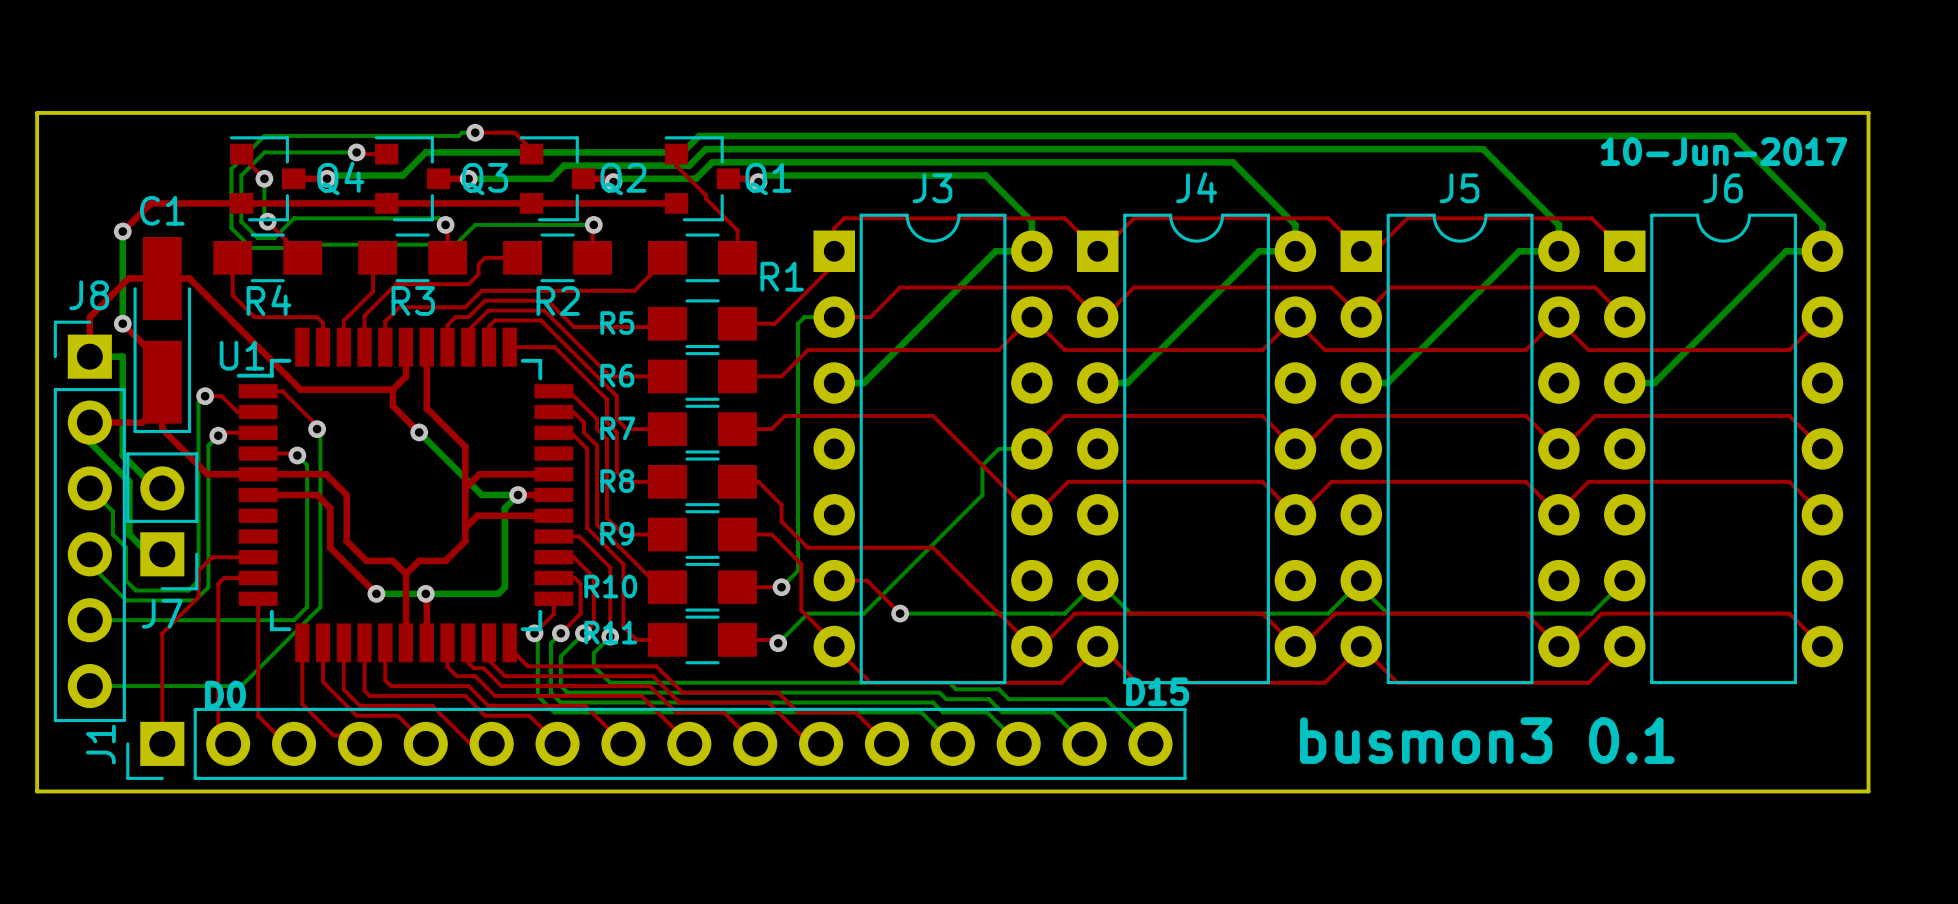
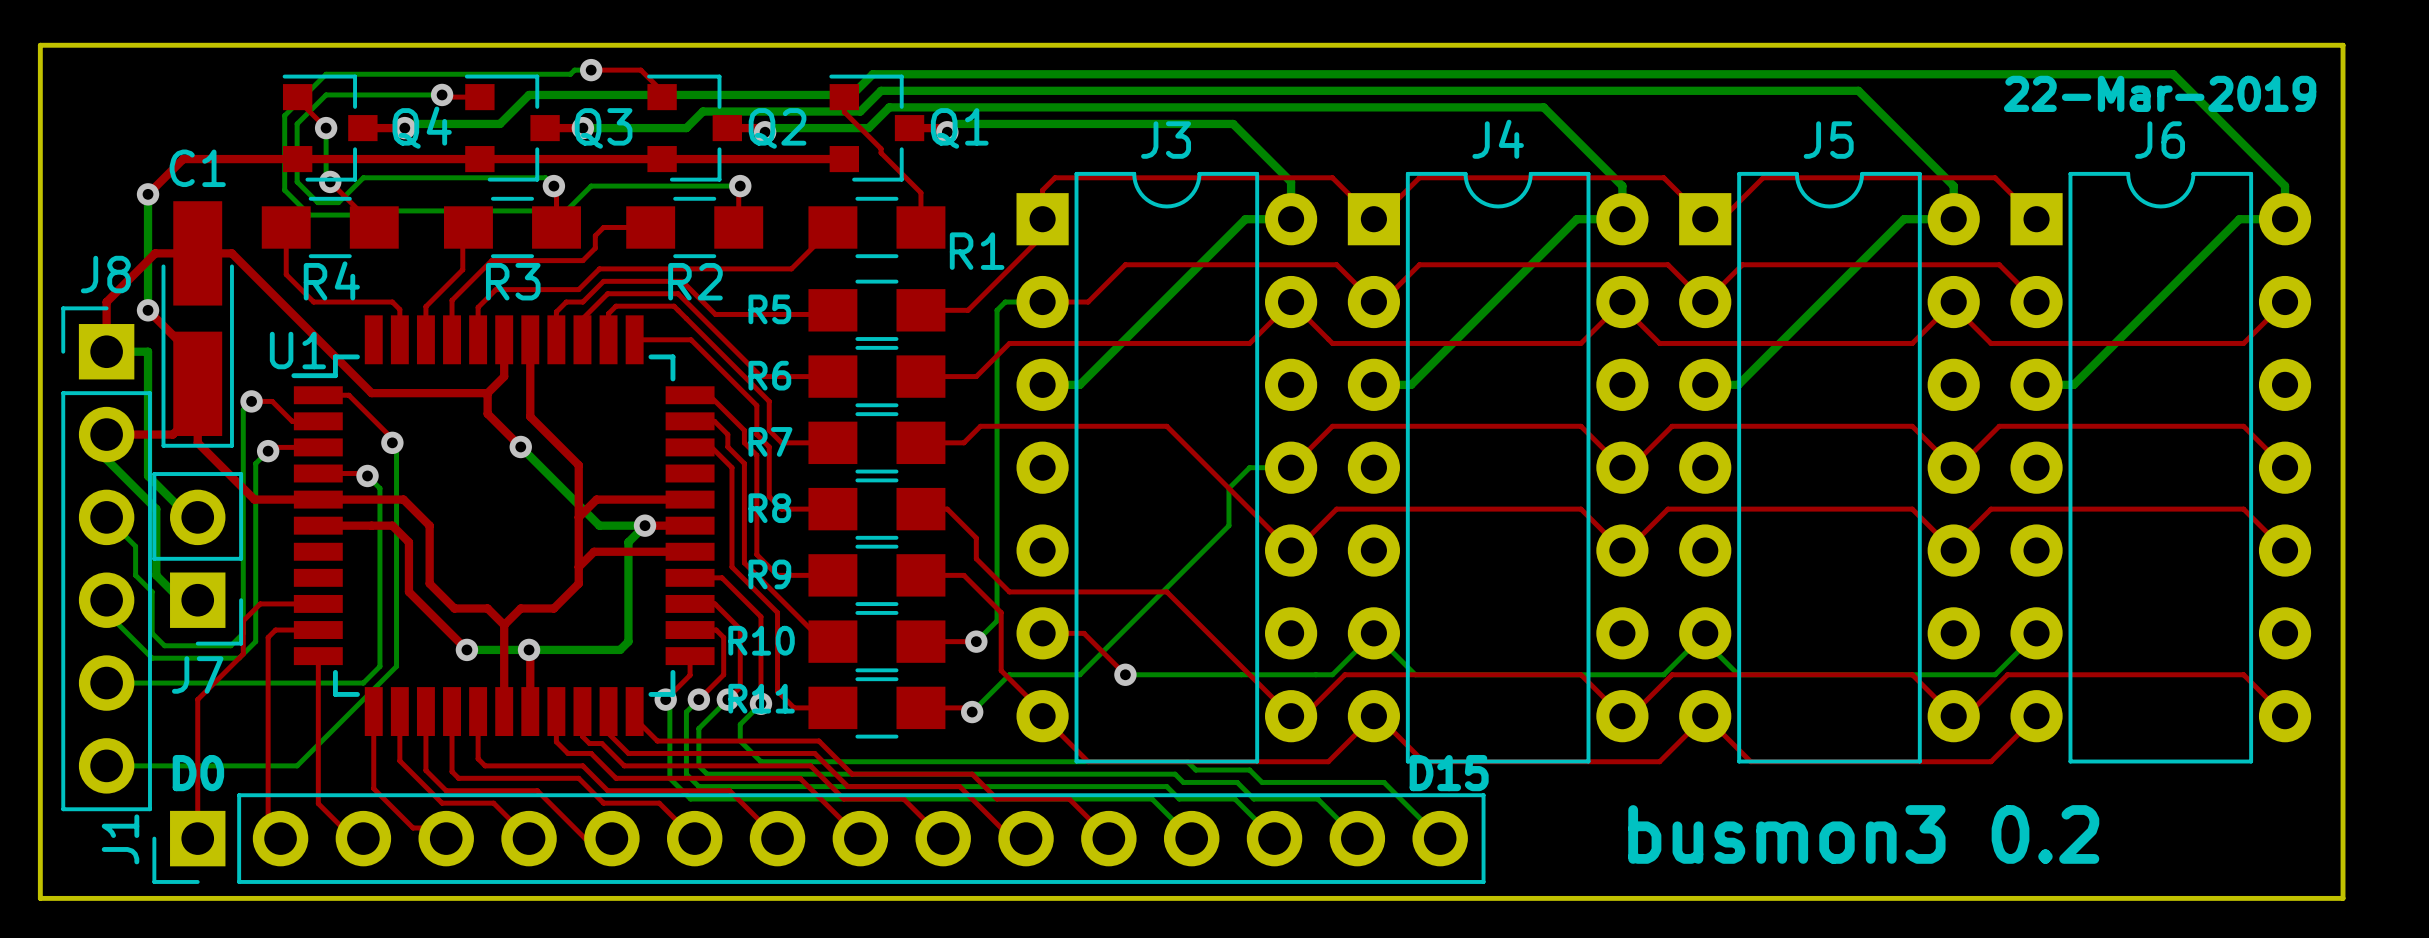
text: 10-Jun-2017 (1724, 151) -> 22-Mar-2019 (2160, 93)
text position: D0 (225, 695) -> D0 (198, 773)
text: busmon3 0.1 (1487, 740) -> busmon3 0.2 (1863, 834)

